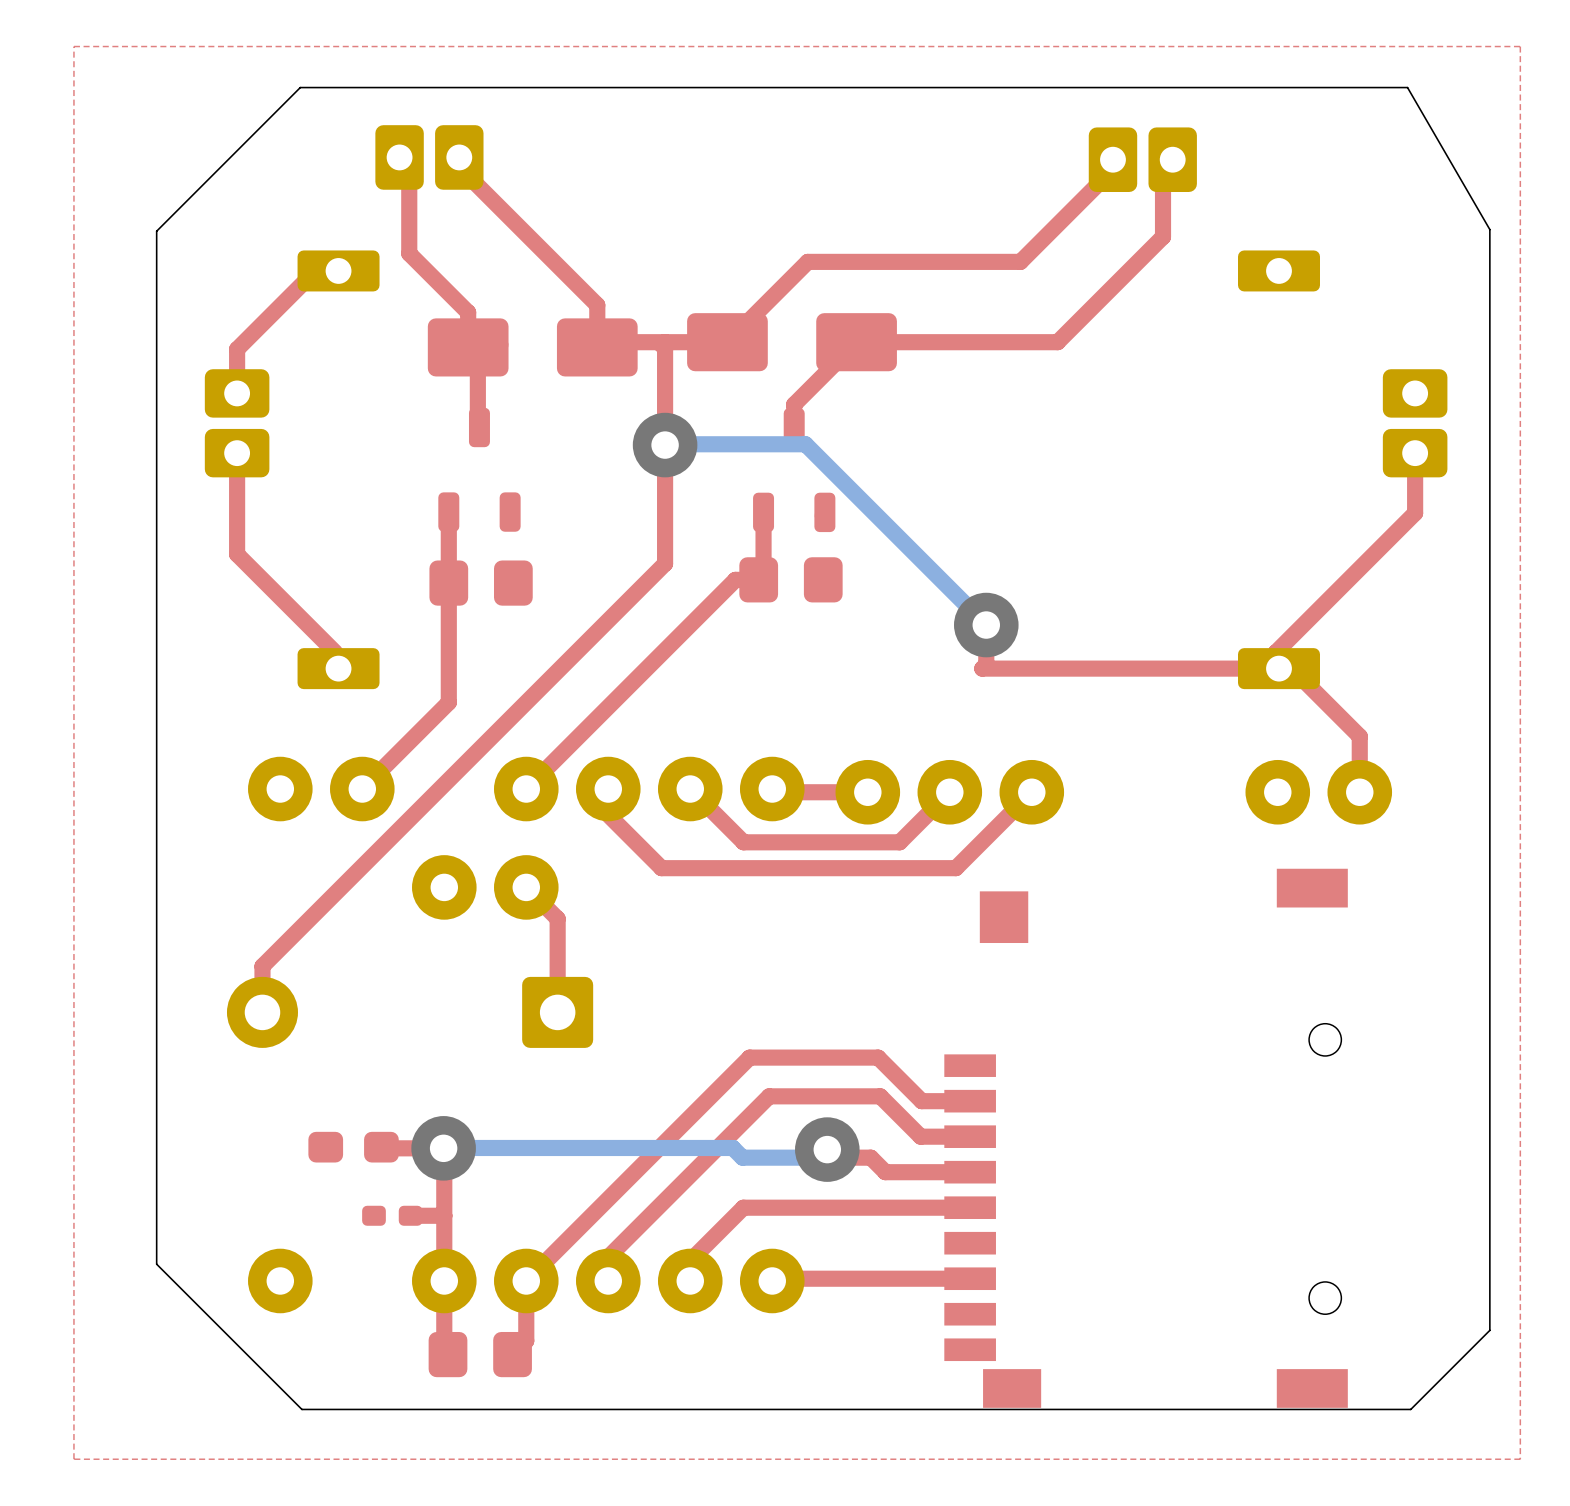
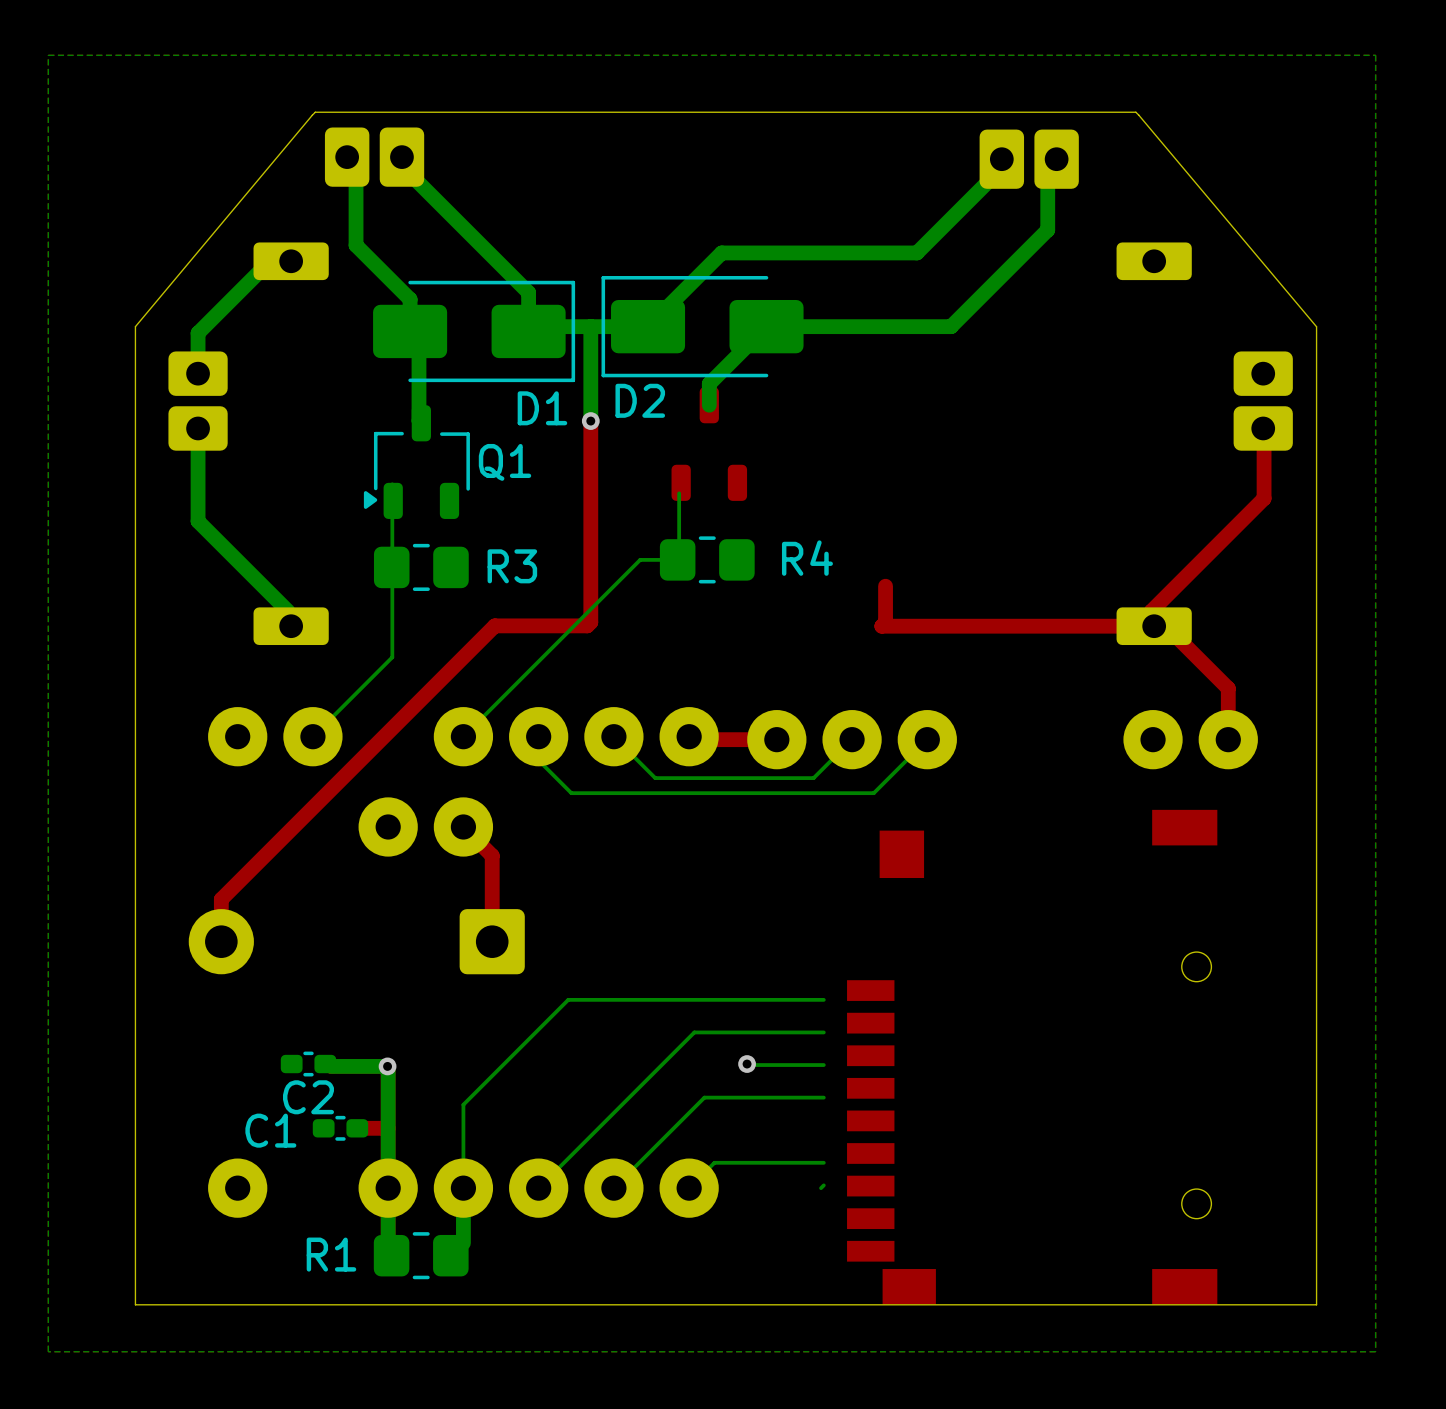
bottom zone outline: none -> (1375, 55) (1375, 1351) (48, 1351) (48, 55) (1375, 55)
board edge: (1407, 87) (1489, 229) (1489, 1330) (1410, 1409) (301, 1409) (156, 1264) (156, 231) (300, 87) (1407, 87) -> (1135, 112) (1316, 326) (1316, 1304) (135, 1304) (135, 326) (312, 115) (315, 112) (1135, 112)
top track: (409, 157) (409, 253) (468, 312) (468, 347) (477, 357) (477, 427) -> none
bottom track: none -> (356, 157) (356, 245) (410, 299) (410, 331)
top track: (449, 157) (597, 305) (597, 347) (602, 342) (727, 342) (807, 261) (1020, 261) (1122, 159) -> none
bottom track: none -> (393, 157) (528, 292) (528, 331)
bottom track: none -> (1010, 159) (916, 252) (721, 252) (648, 326) (533, 326)
top track: (1163, 159) (1163, 236) (1057, 342) (856, 342) (794, 404) (794, 427) -> none
bottom track: none -> (1047, 159) (1047, 229) (951, 326) (766, 326) (709, 383) (709, 405)
top track: (315, 270) (237, 349) (237, 393) -> none
bottom track: none -> (269, 261) (198, 333) (198, 373)
D2 side: top (792, 342) -> bottom (702, 326)
top track: (661, 345) (665, 342) (665, 445) -> none
D1 side: top (532, 347) -> bottom (474, 331)
bottom track: none -> (418, 340) (418, 420) (421, 423)
via size: [632, 412, 698, 478] -> [581, 412, 600, 430]
part position: (1415, 423) -> (1263, 401)
bottom track: (665, 444) (805, 444) (986, 625) -> (590, 421) (590, 326)
top track: (237, 453) (237, 554) (335, 652) -> none
bottom track: none -> (198, 428) (198, 521) (288, 611)
top track: (1415, 453) (1415, 513) (1398, 529) -> (1263, 428) (1264, 498)
Q1 side: top (479, 469) -> bottom (416, 462)
top track: (447, 512) (448, 513) (448, 702) (362, 789) -> none
top track: (763, 512) (763, 575) (758, 579) (735, 579) (526, 789) -> none
bottom track: none -> (392, 484) (392, 657) (312, 736)
bottom track: none -> (679, 493) (679, 558) (640, 559) (463, 736)
top track: (665, 563) (560, 668) -> (590, 529) (590, 622) (587, 625) (494, 625)
R4 side: top (790, 579) -> bottom (707, 559)
R3 side: top (481, 583) -> bottom (421, 567)
via: (986, 625) -> none
top track: (690, 789) (743, 842) (899, 842) (949, 792) -> none
bottom track: none -> (613, 736) (655, 778) (813, 778) (852, 739)
top track: (1031, 792) (955, 868) (661, 868) (608, 814) -> none
bottom track: none -> (927, 739) (873, 793) (571, 793) (538, 760)
bottom track: none -> (823, 999) (568, 999) (463, 1104) (463, 1243)
top track: (970, 1101) (921, 1101) (878, 1057) (749, 1057) (526, 1280) (526, 1340) (512, 1354) -> none
bottom track: none -> (823, 1032) (694, 1032) (538, 1188)
via size: [411, 1116, 476, 1181] -> [378, 1057, 397, 1076]
via size: [795, 1117, 860, 1182] -> [738, 1055, 756, 1073]
top track: (970, 1136) (920, 1136) (880, 1096) (769, 1096) (608, 1257) -> none
C2: none -> (308, 1064)
bottom track: none -> (747, 1064) (823, 1065)
part: (353, 1147) -> none
bottom track: (443, 1147) (732, 1147) (742, 1157) (819, 1157) (827, 1149) -> (388, 1067) (388, 1252)
bottom track: none -> (387, 1066) (331, 1066)
top track: (827, 1149) (835, 1157) (870, 1157) (885, 1172) (970, 1172) -> none
bottom track: none -> (823, 1097) (704, 1097) (613, 1188)
top track: (970, 1207) (743, 1207) (690, 1260) -> none
C1 side: top (392, 1215) -> bottom (340, 1128)
bottom track: none -> (823, 1162) (714, 1162) (689, 1188)
bottom track: none -> (823, 1185) (821, 1188)
top track: (970, 1278) (774, 1278) -> none
R1 side: top (480, 1354) -> bottom (421, 1255)

